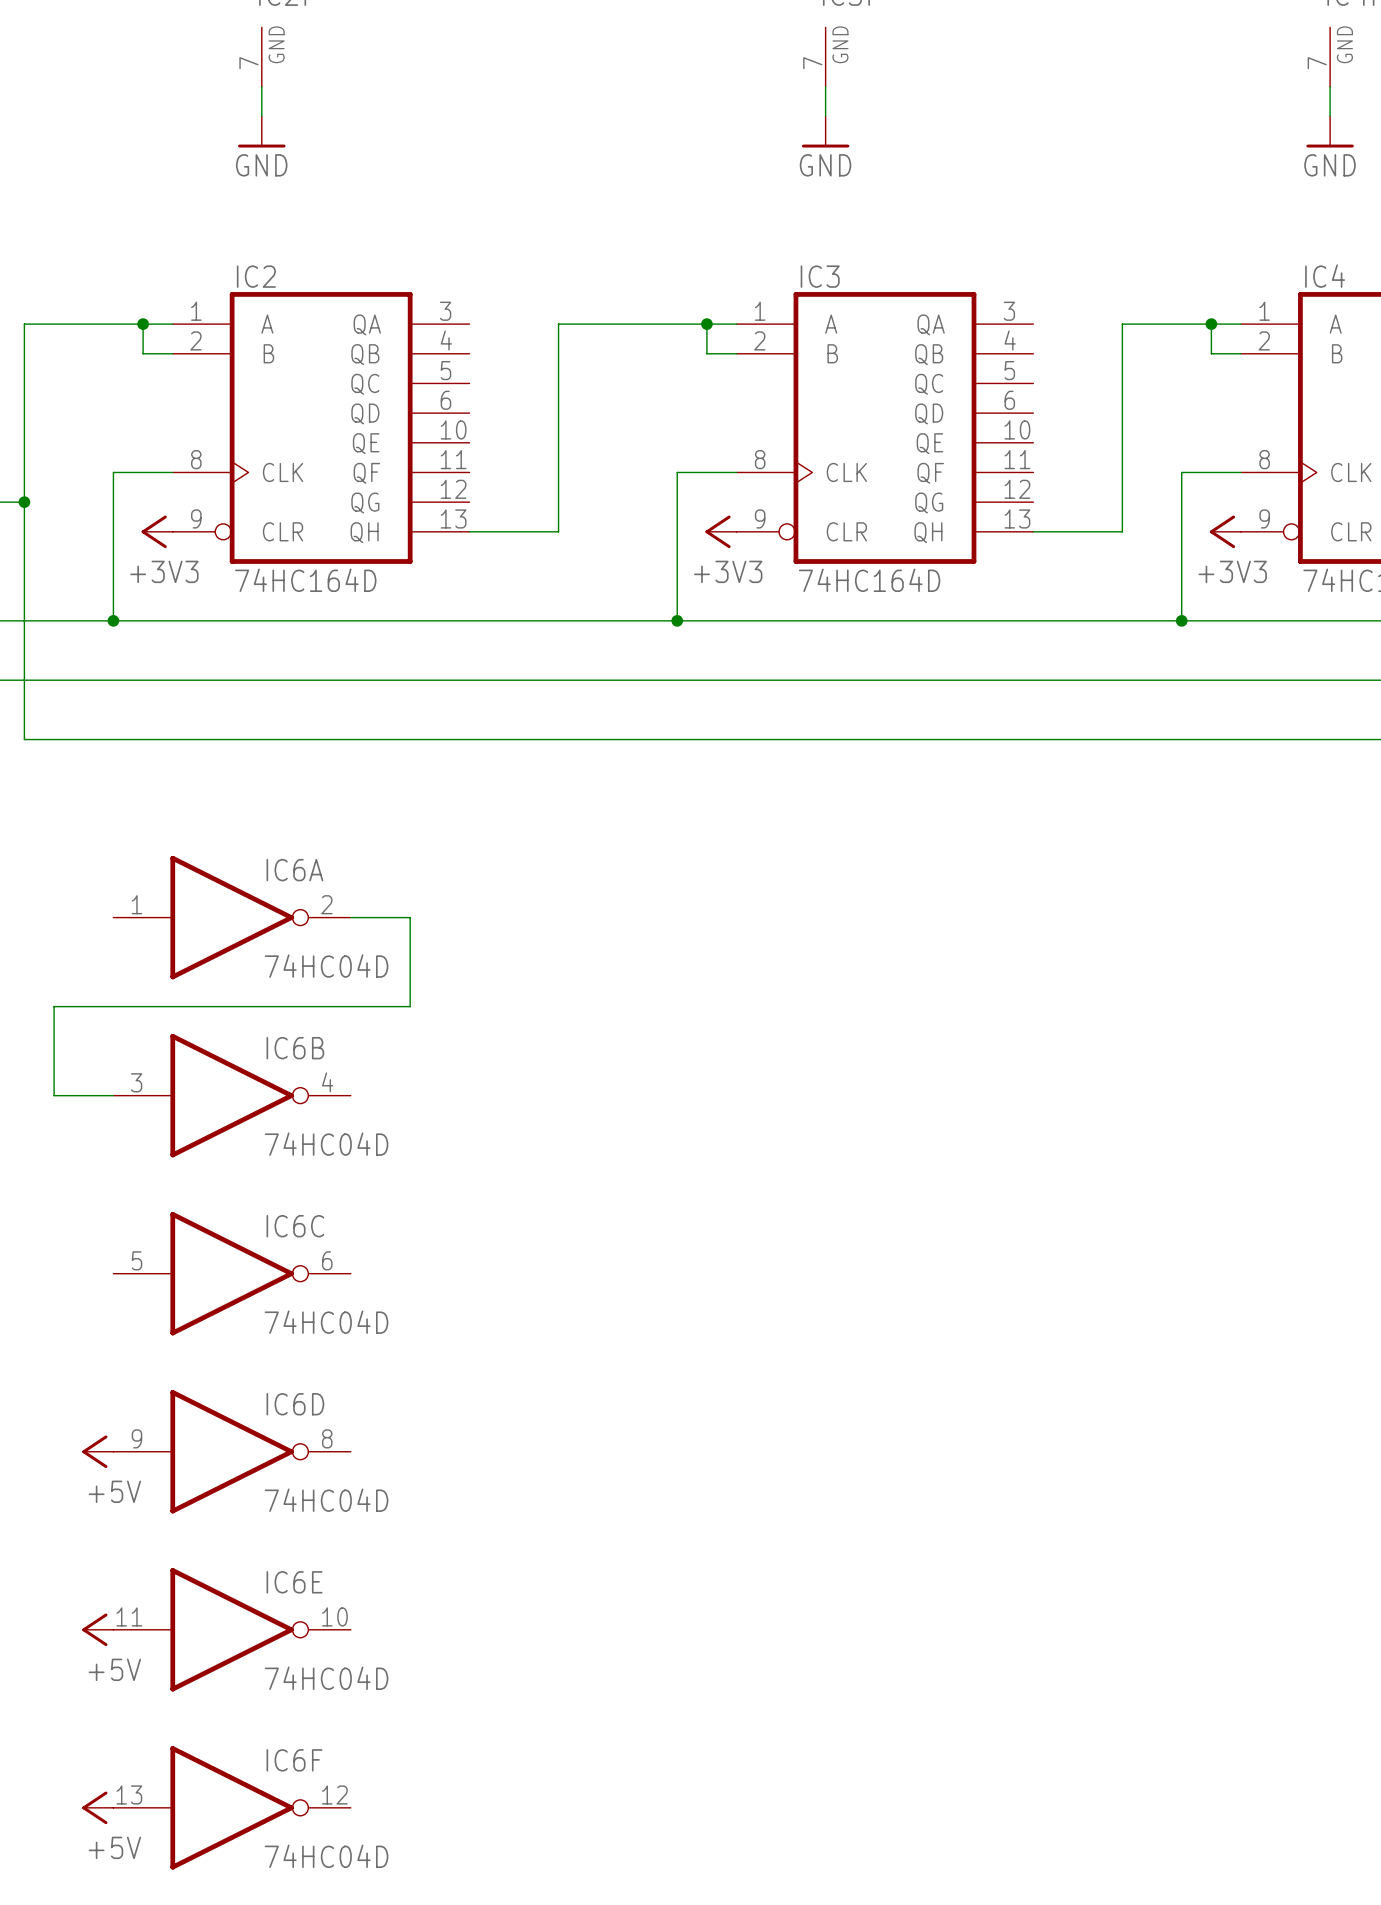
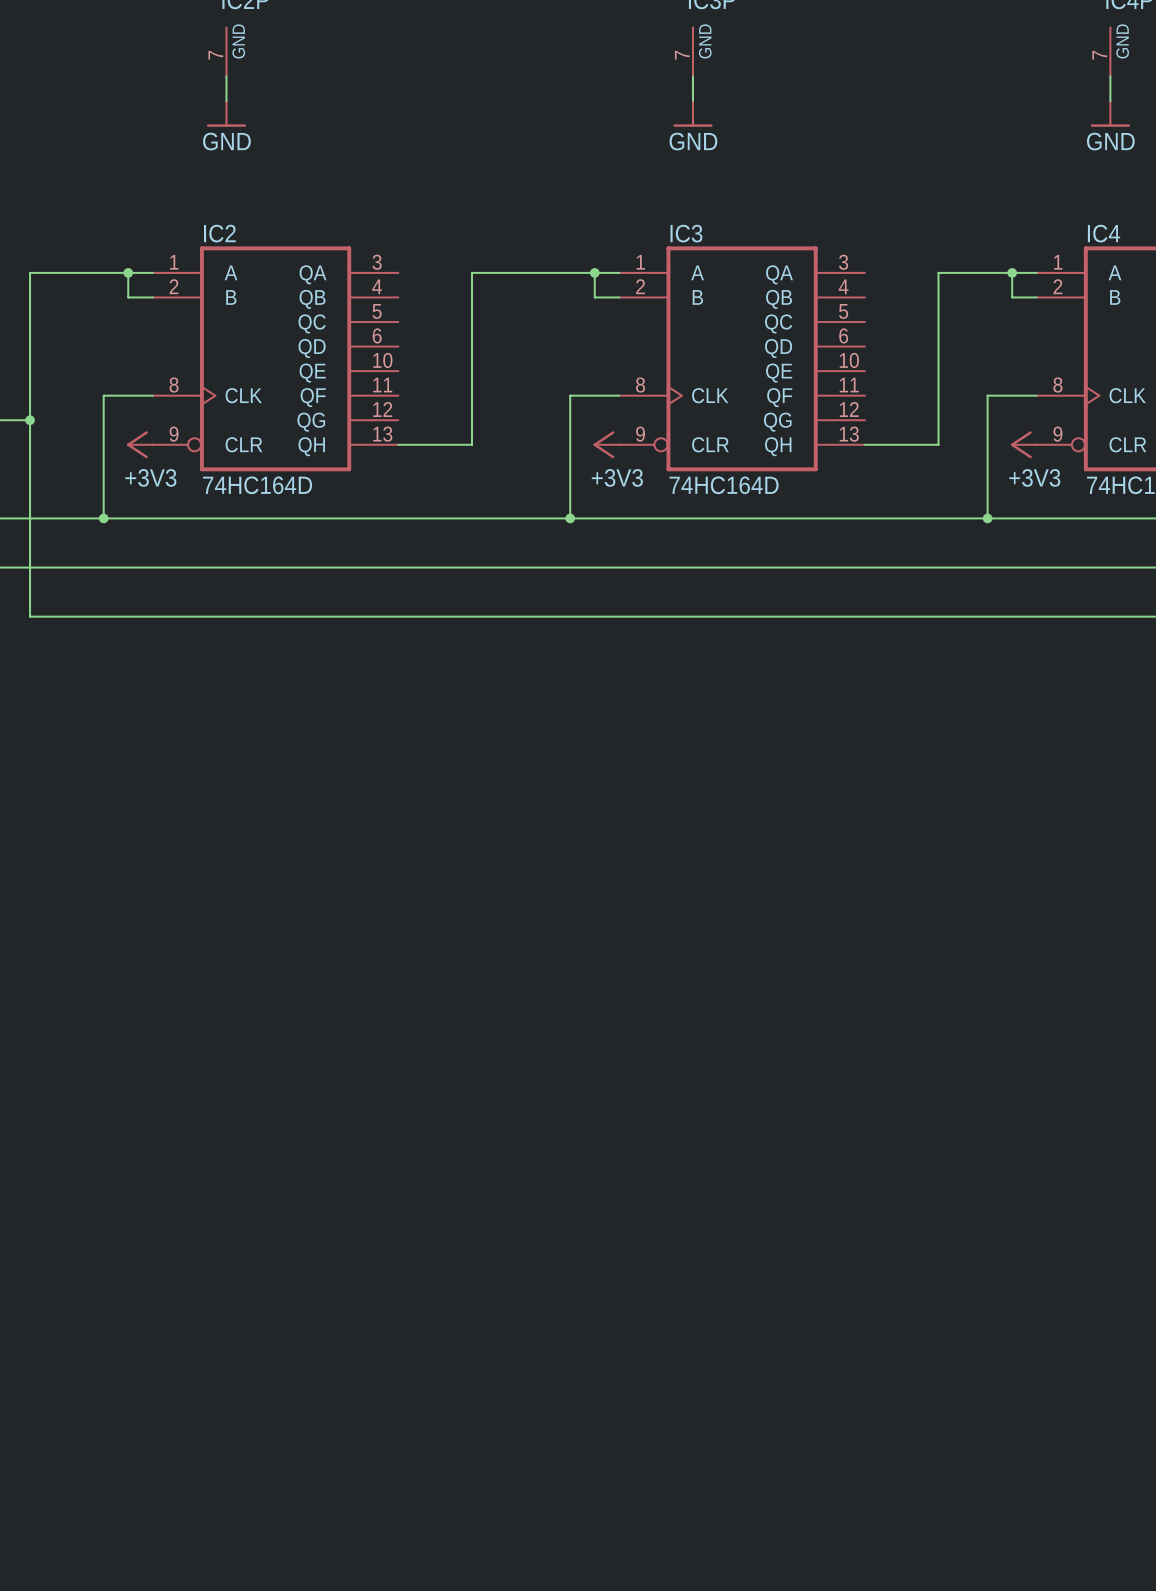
IC6A: 74HC04D (232, 917) -> none
wire: (350, 917) (410, 917) (410, 1006) (54, 1006) (54, 1095) (113, 1095) -> none
IC6B: 74HC04D (232, 1095) -> none
IC6C: 74HC04D (232, 1273) -> none
power symbol: +5V (97, 1451) -> none
IC6D: 74HC04D (232, 1451) -> none
power symbol: +5V (97, 1629) -> none
IC6E: 74HC04D (232, 1629) -> none
power symbol: +5V (97, 1807) -> none
IC6F: 74HC04D (232, 1807) -> none

